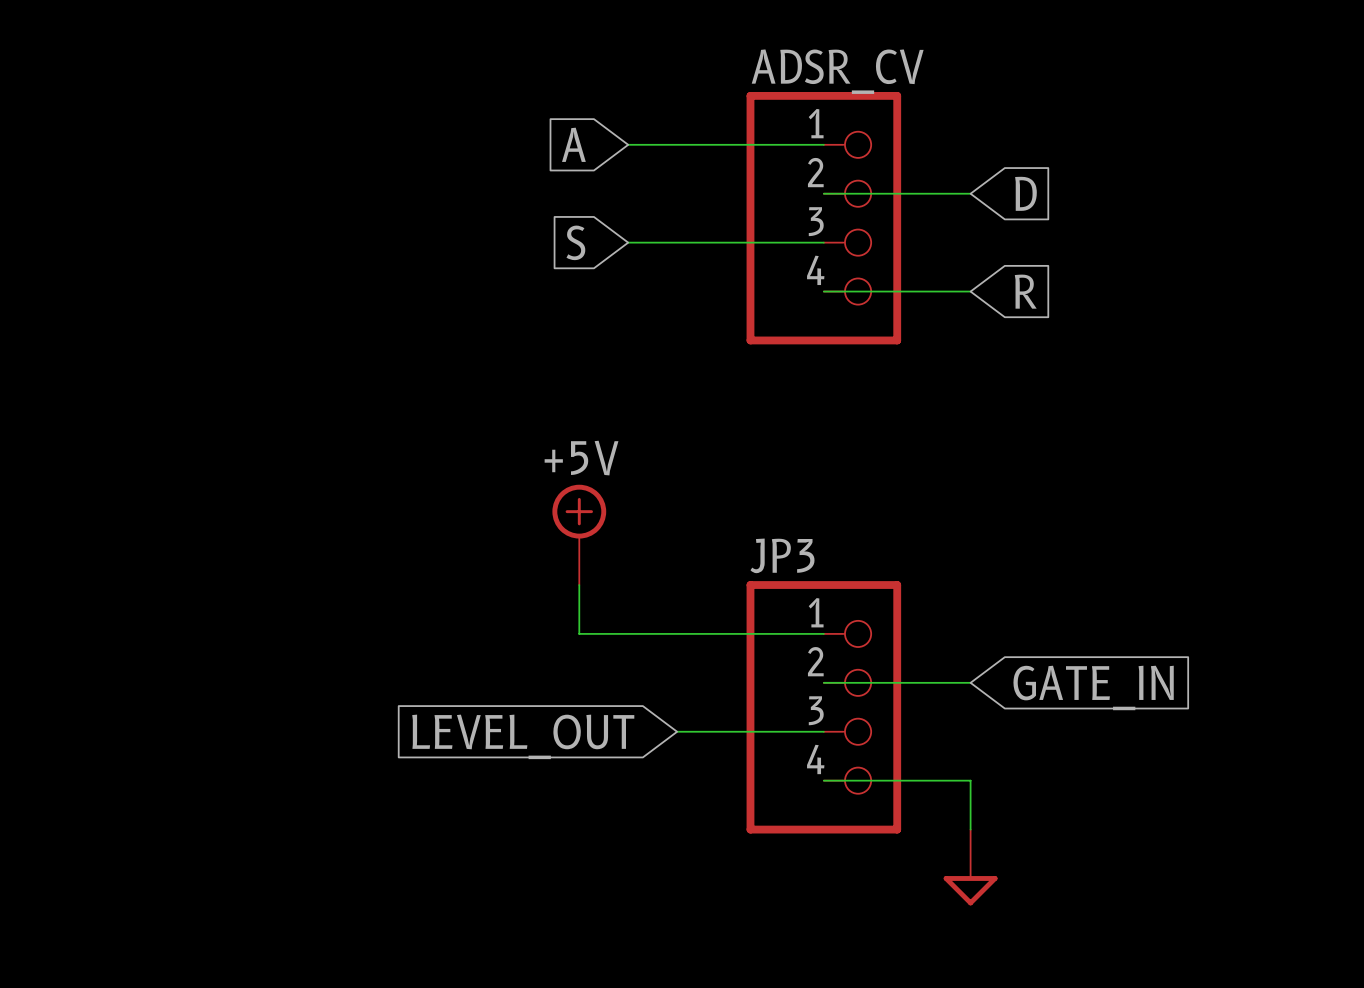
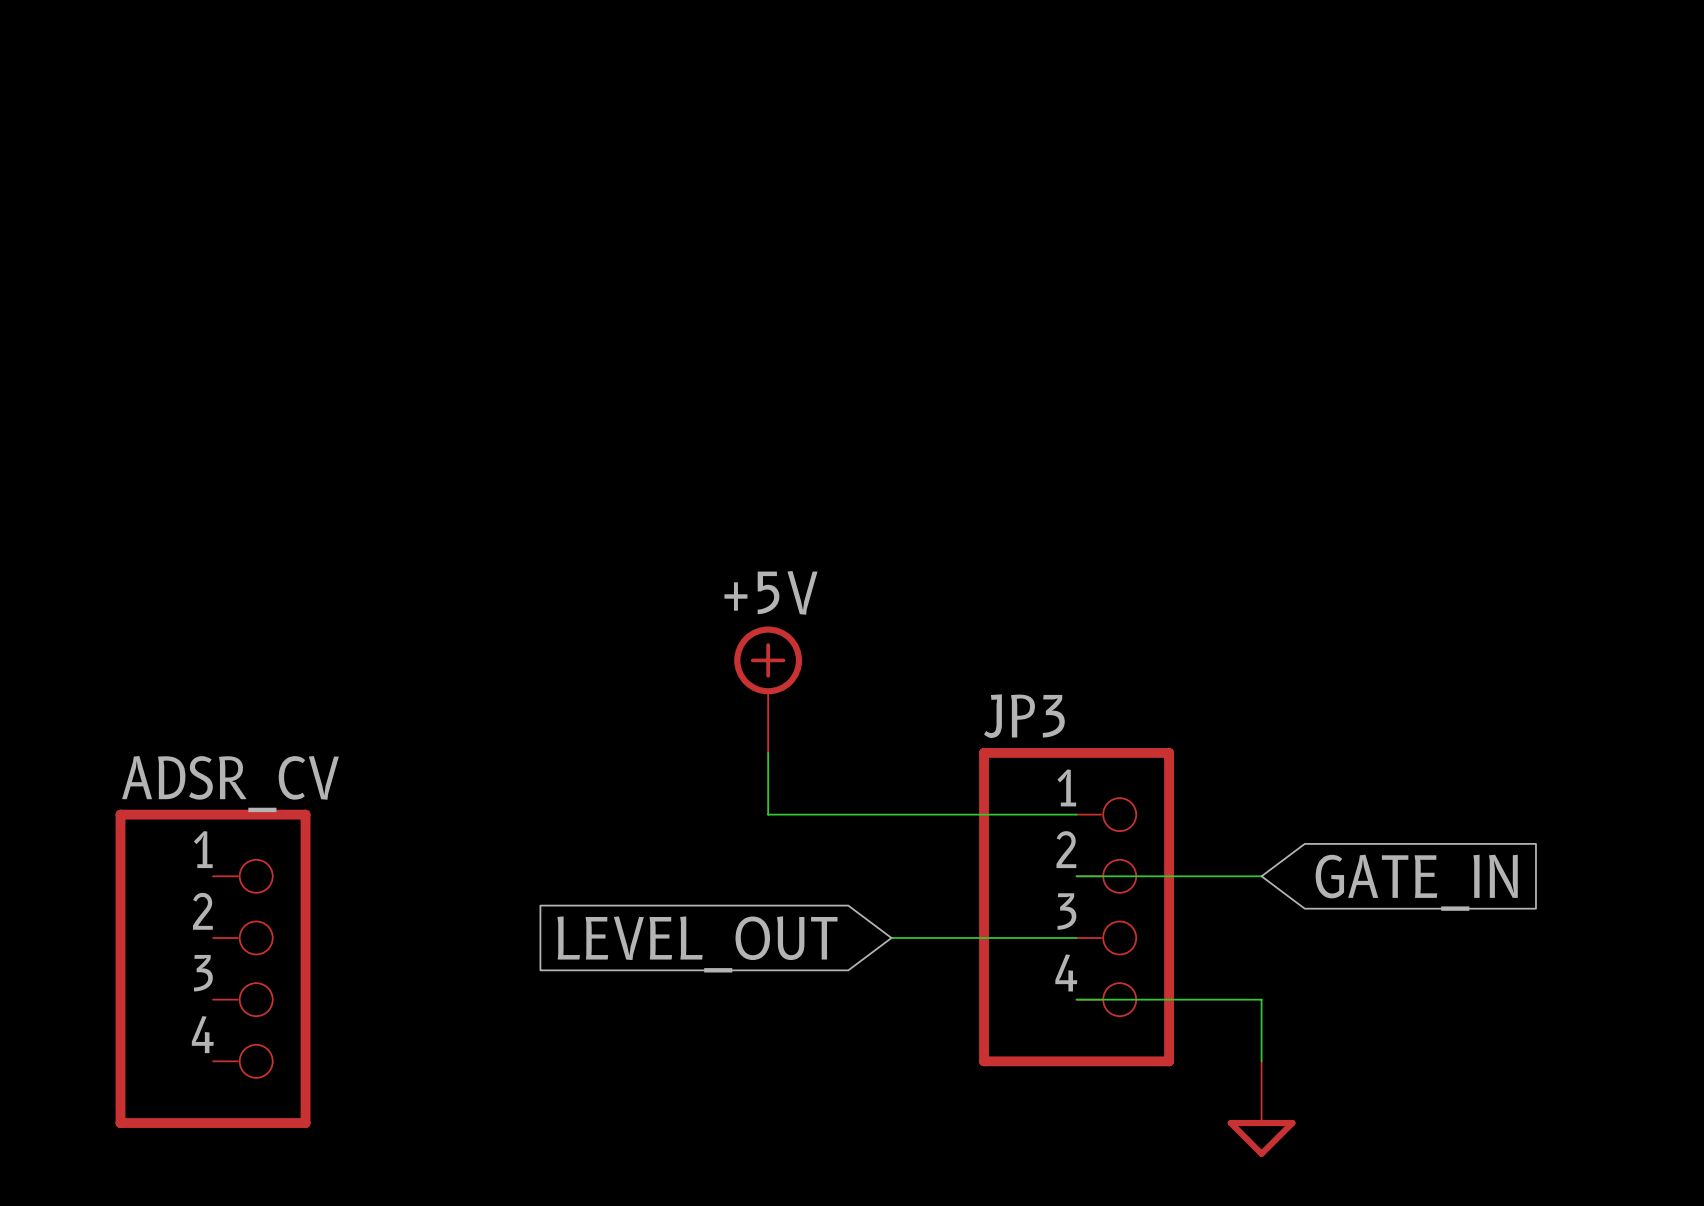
global label: A (573, 144) -> none
wire: (628, 144) (823, 144) -> none
wire: (823, 193) (970, 193) -> none
global label: D (1025, 193) -> none
ADSR_CV: (823, 218) -> none
global label: S (575, 242) -> none
wire: (628, 242) (823, 242) -> none
wire: (823, 291) (970, 291) -> none
global label: R (1025, 291) -> none
ADSR_CV: none -> (213, 968)

